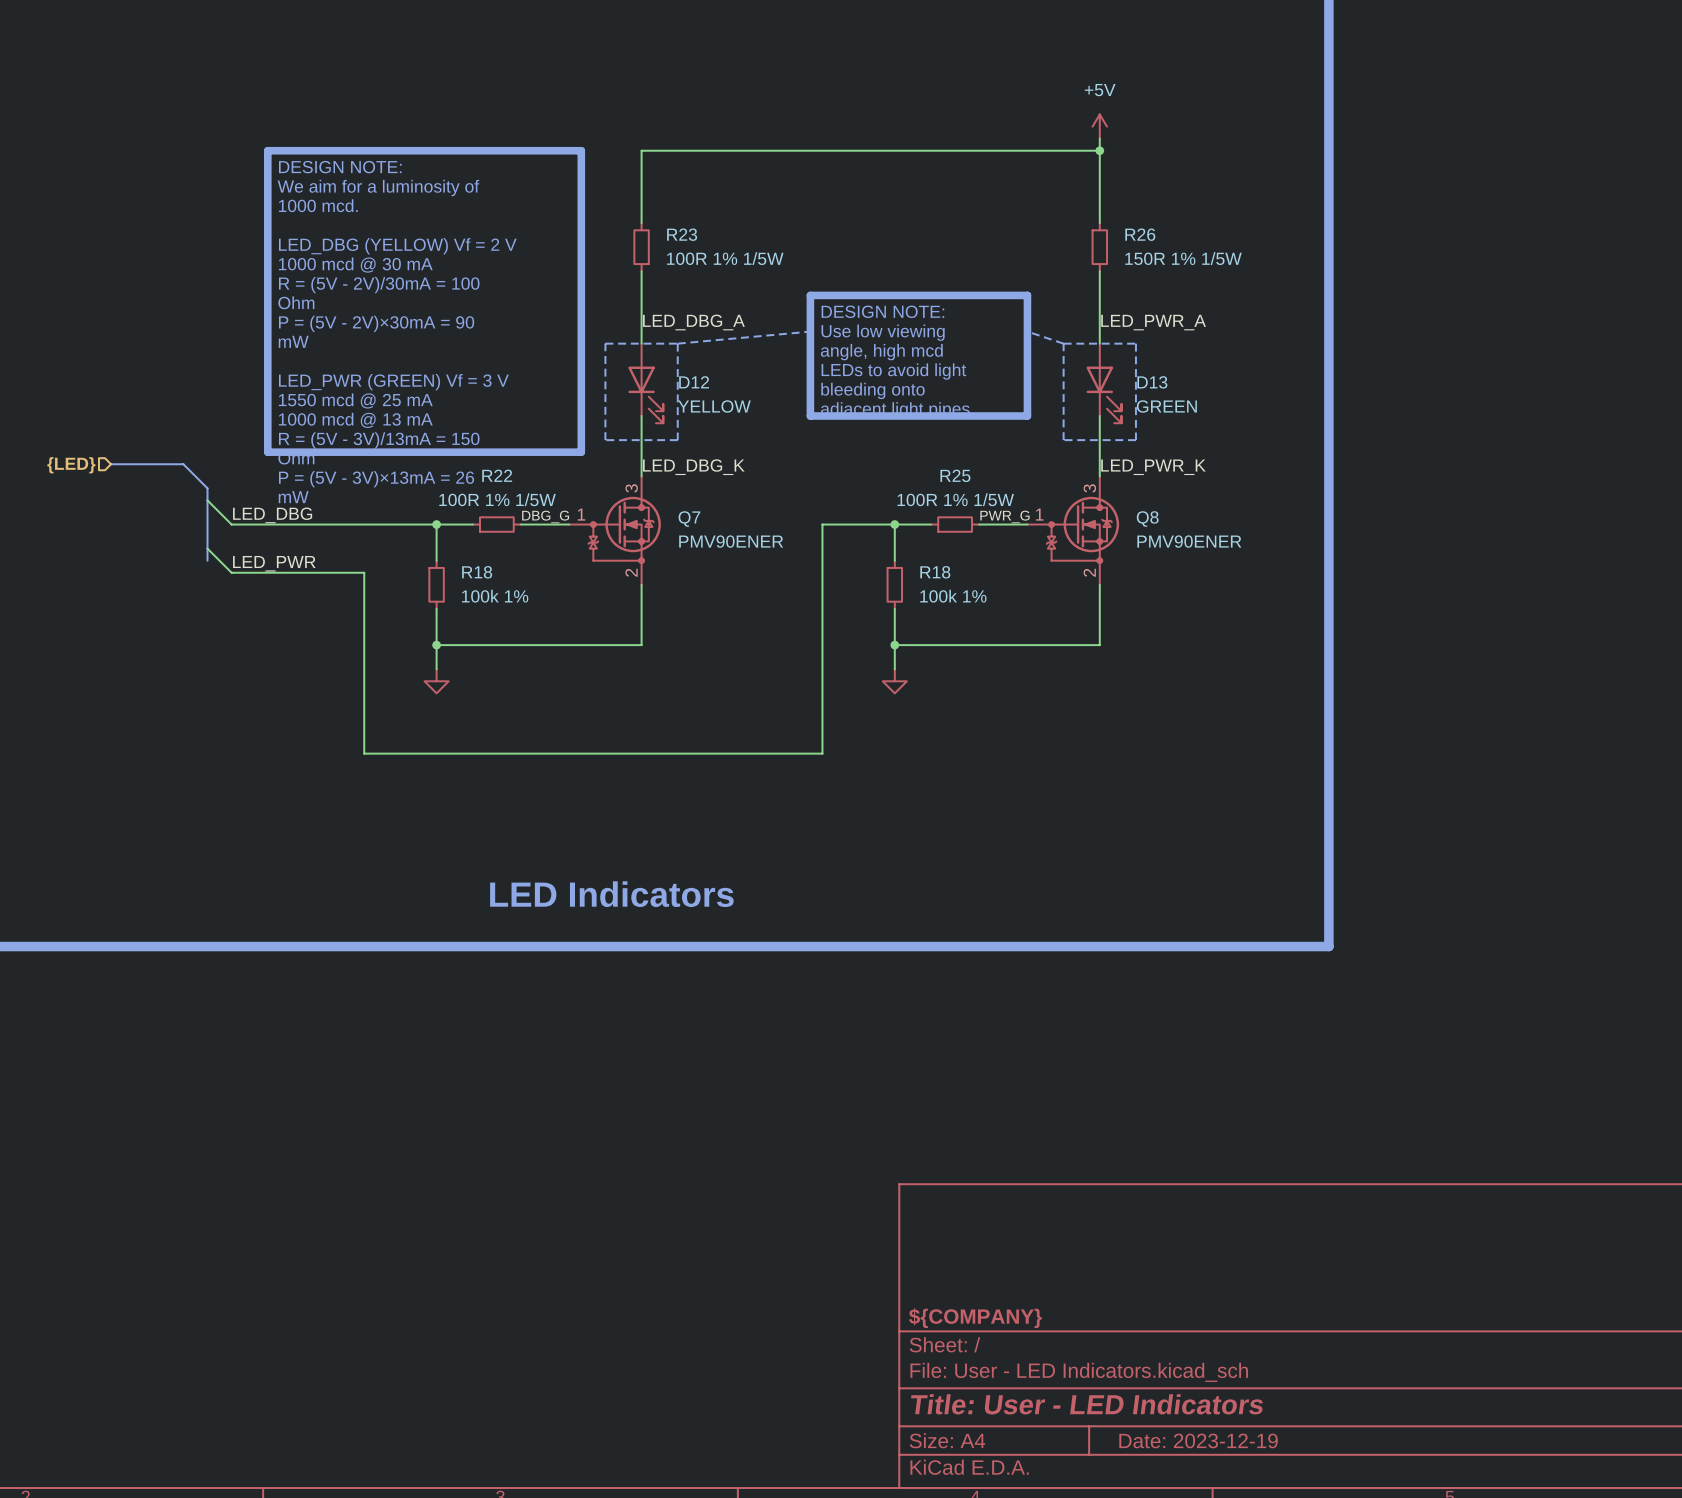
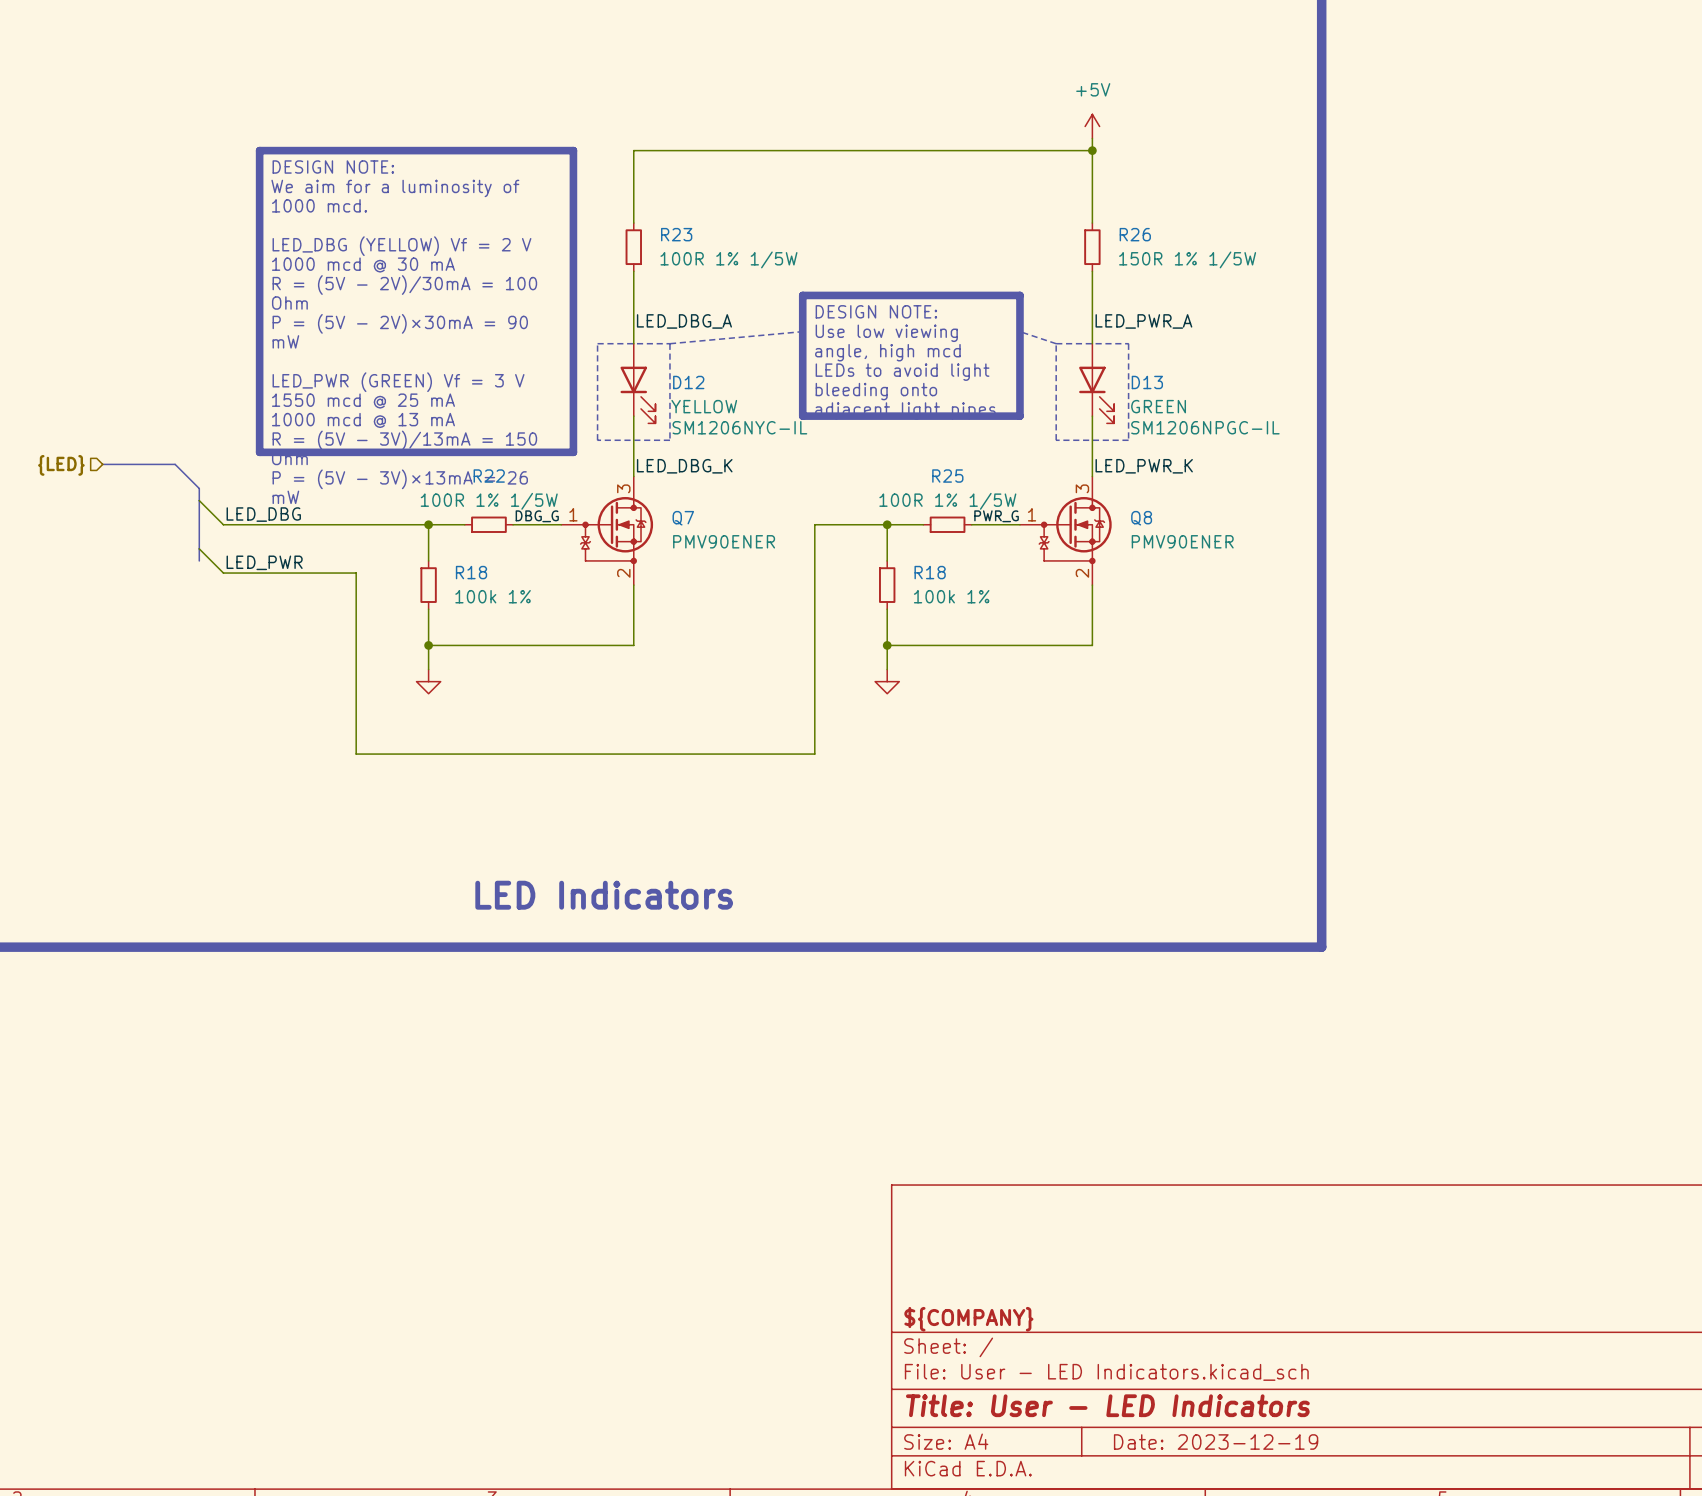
D12 text: none -> SM1206NYC-IL (739, 427)
D13 text: none -> SM1206NPGC-IL (1205, 427)

